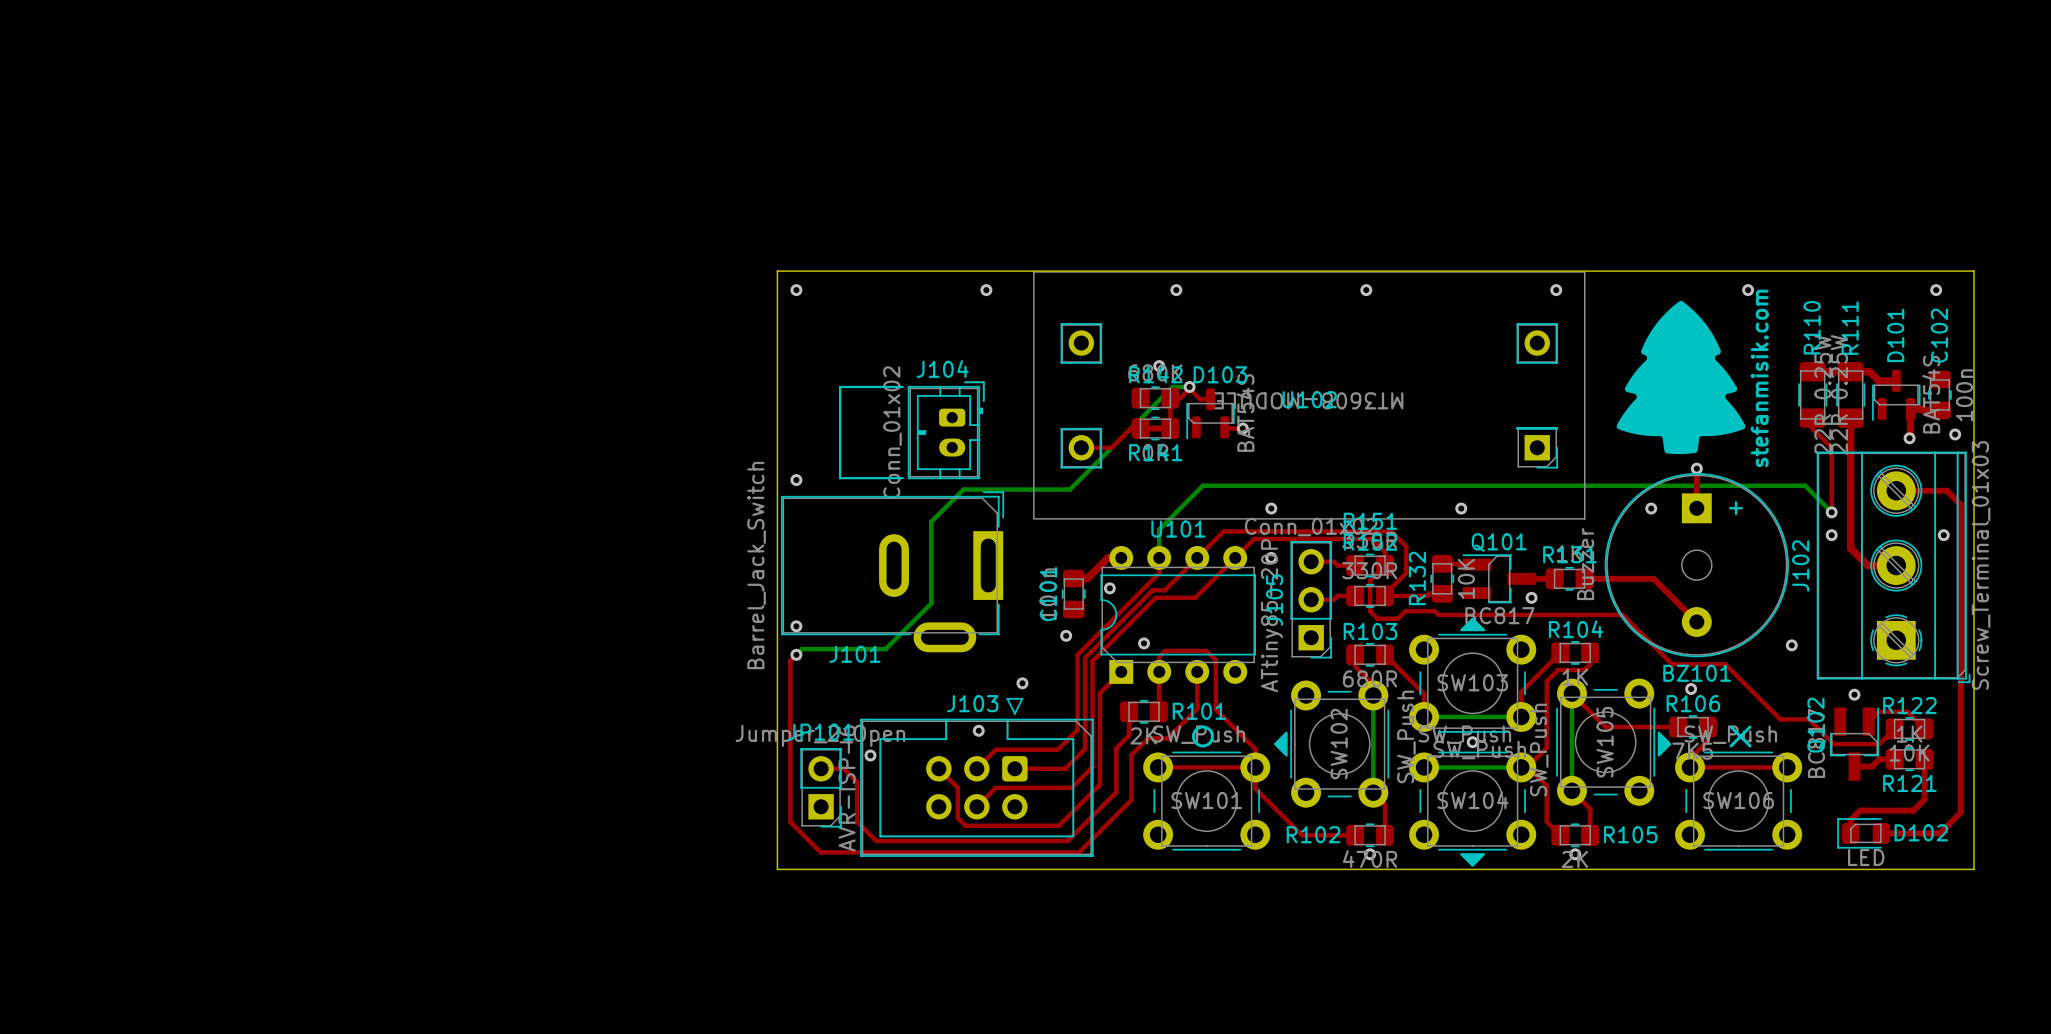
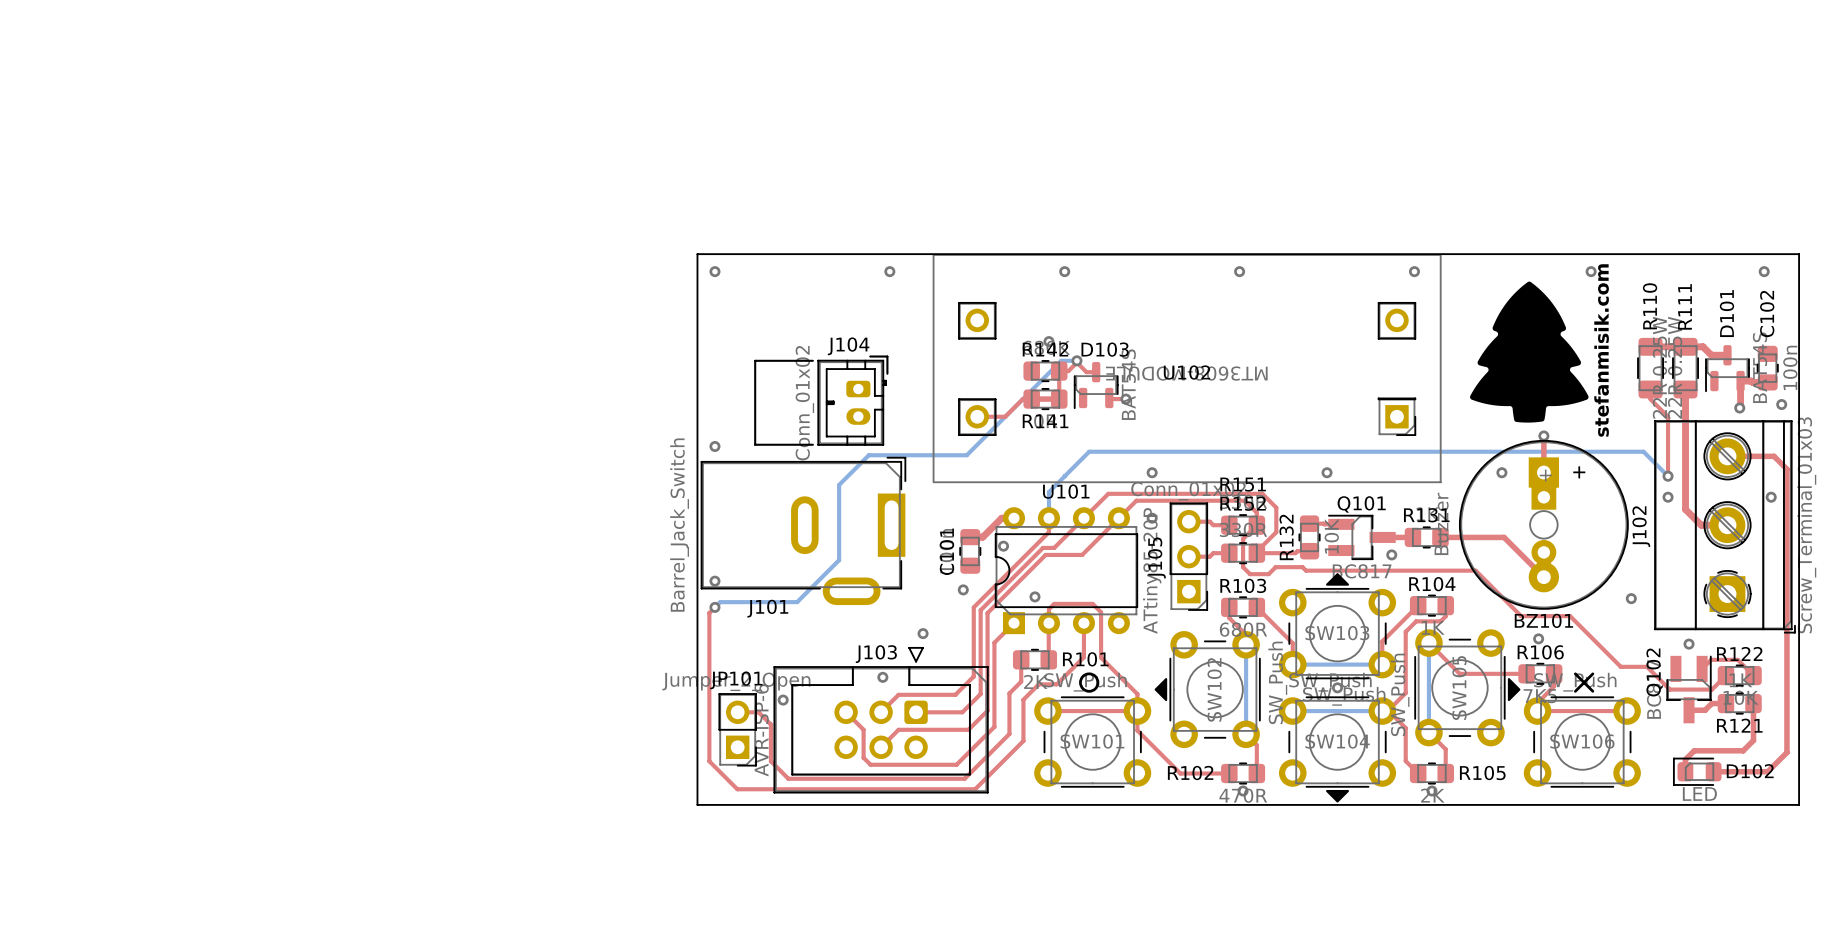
BZ101 footprint: [1604, 473, 1789, 658] -> [1459, 440, 1629, 610]

